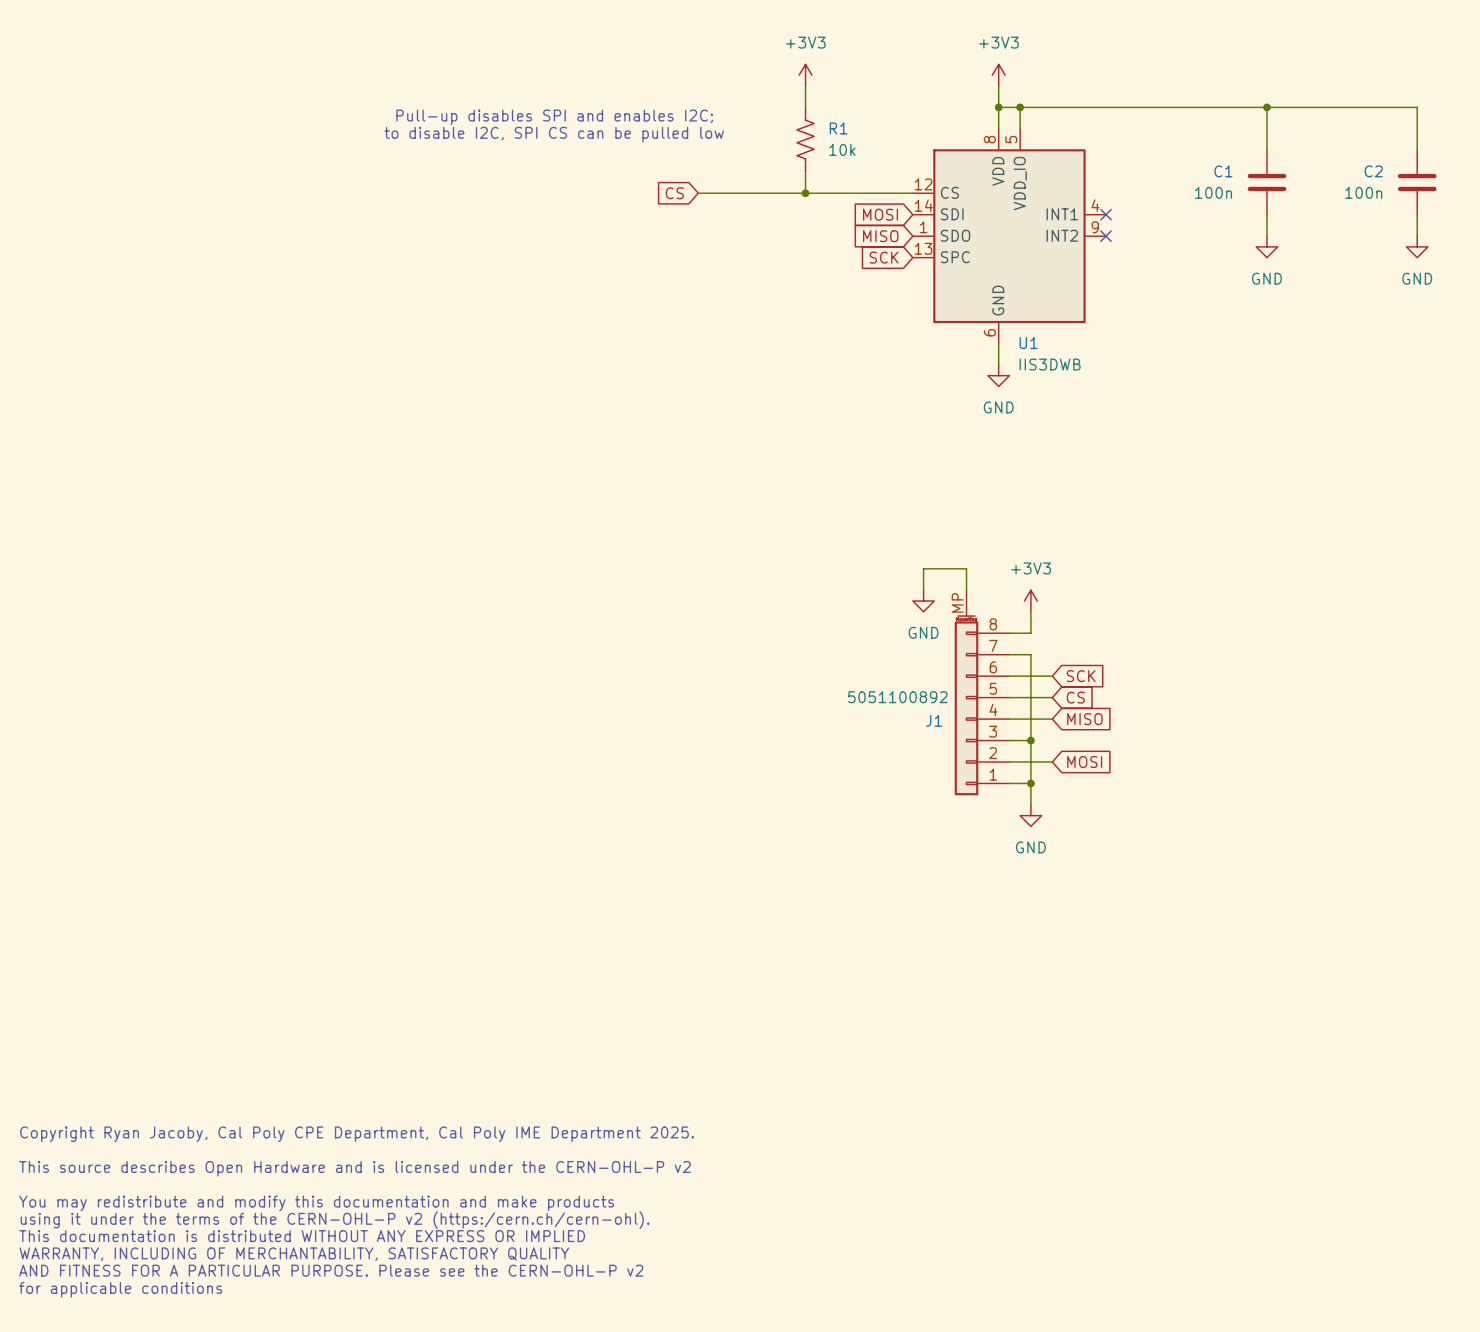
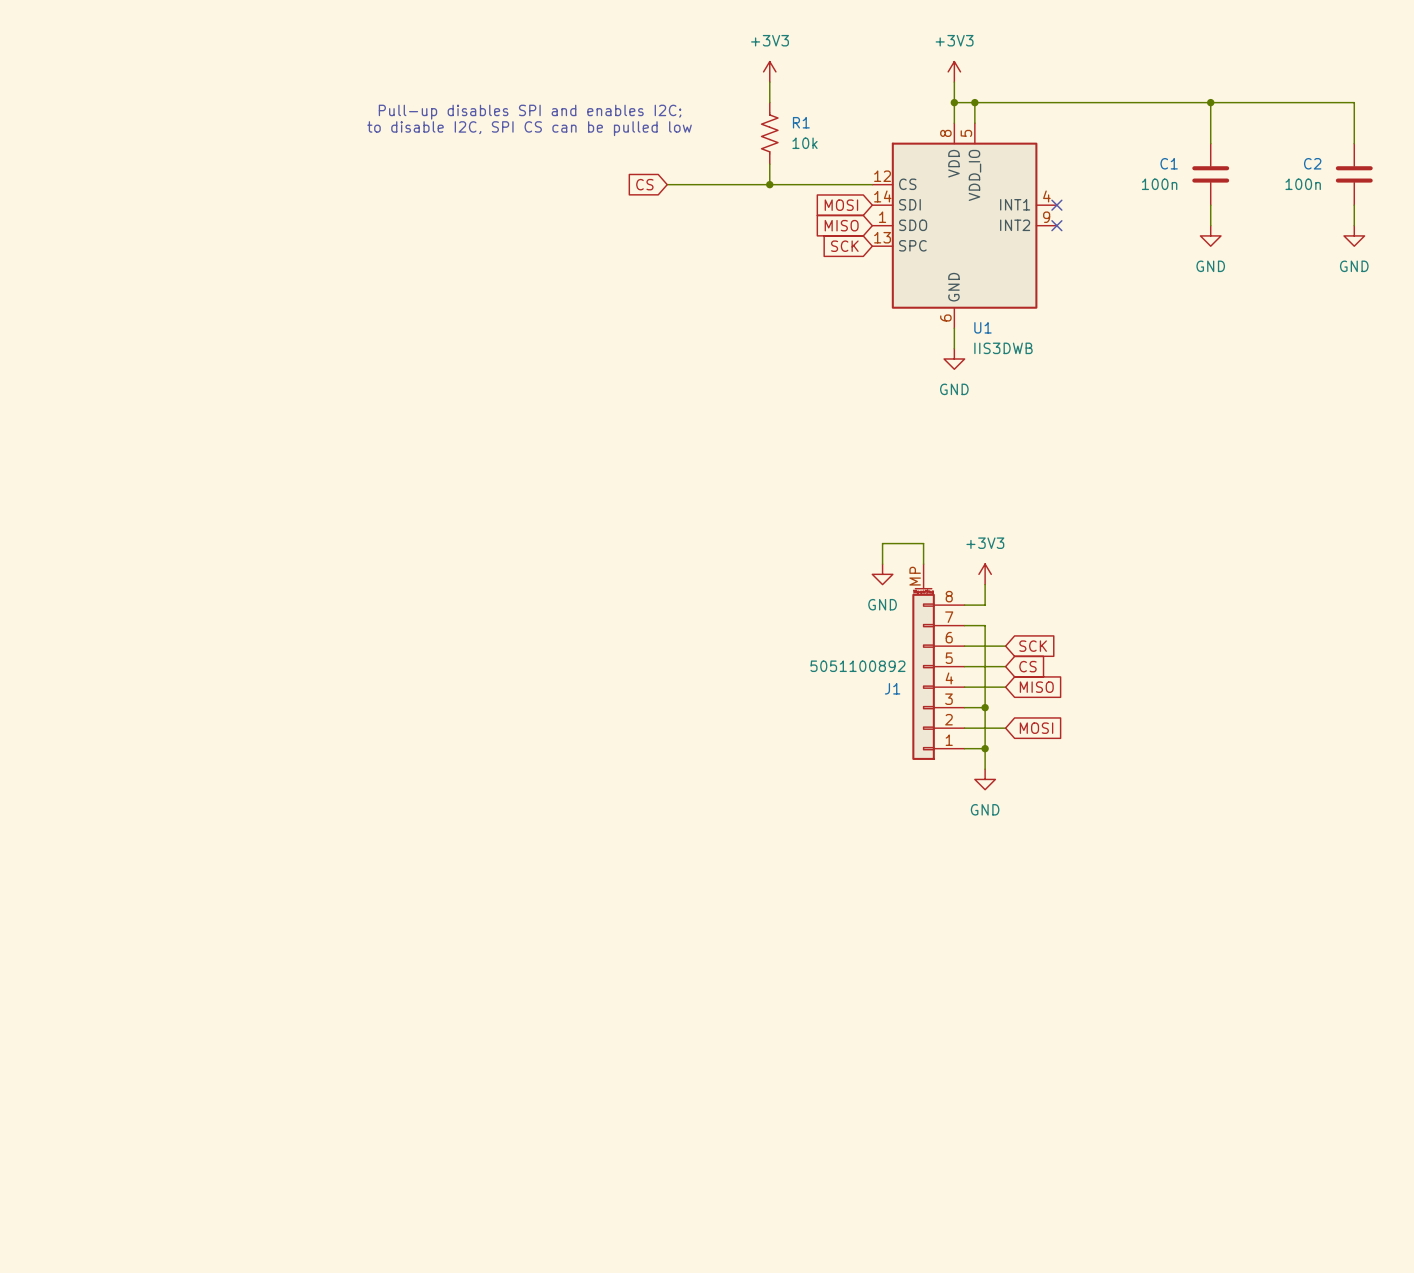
text: Copyright Ryan Jacoby, Cal Poly CPE Department, Cal Poly IME Department 2025. (357, 1134) -> none
text: This source describes Open Hardware and is licensed under the CERN-OHL-P v2 (354, 1168) -> none
text: You may redistribute and modify this documentation and make products (316, 1203) -> none
text: using it under the terms of the CERN-OHL-P v2 (https:/cern.ch/cern-ohl). (335, 1220) -> none
text: This documentation is distributed WITHOUT ANY EXPRESS OR IMPLIED (302, 1236) -> none
text: WARRANTY, INCLUDING OF MERCHANTABILITY, SATISFACTORY QUALITY (294, 1254) -> none
text: AND FITNESS FOR A PARTICULAR PURPOSE. Please see the CERN-OHL-P v2 (331, 1270) -> none
text: for applicable conditions (120, 1289) -> none

